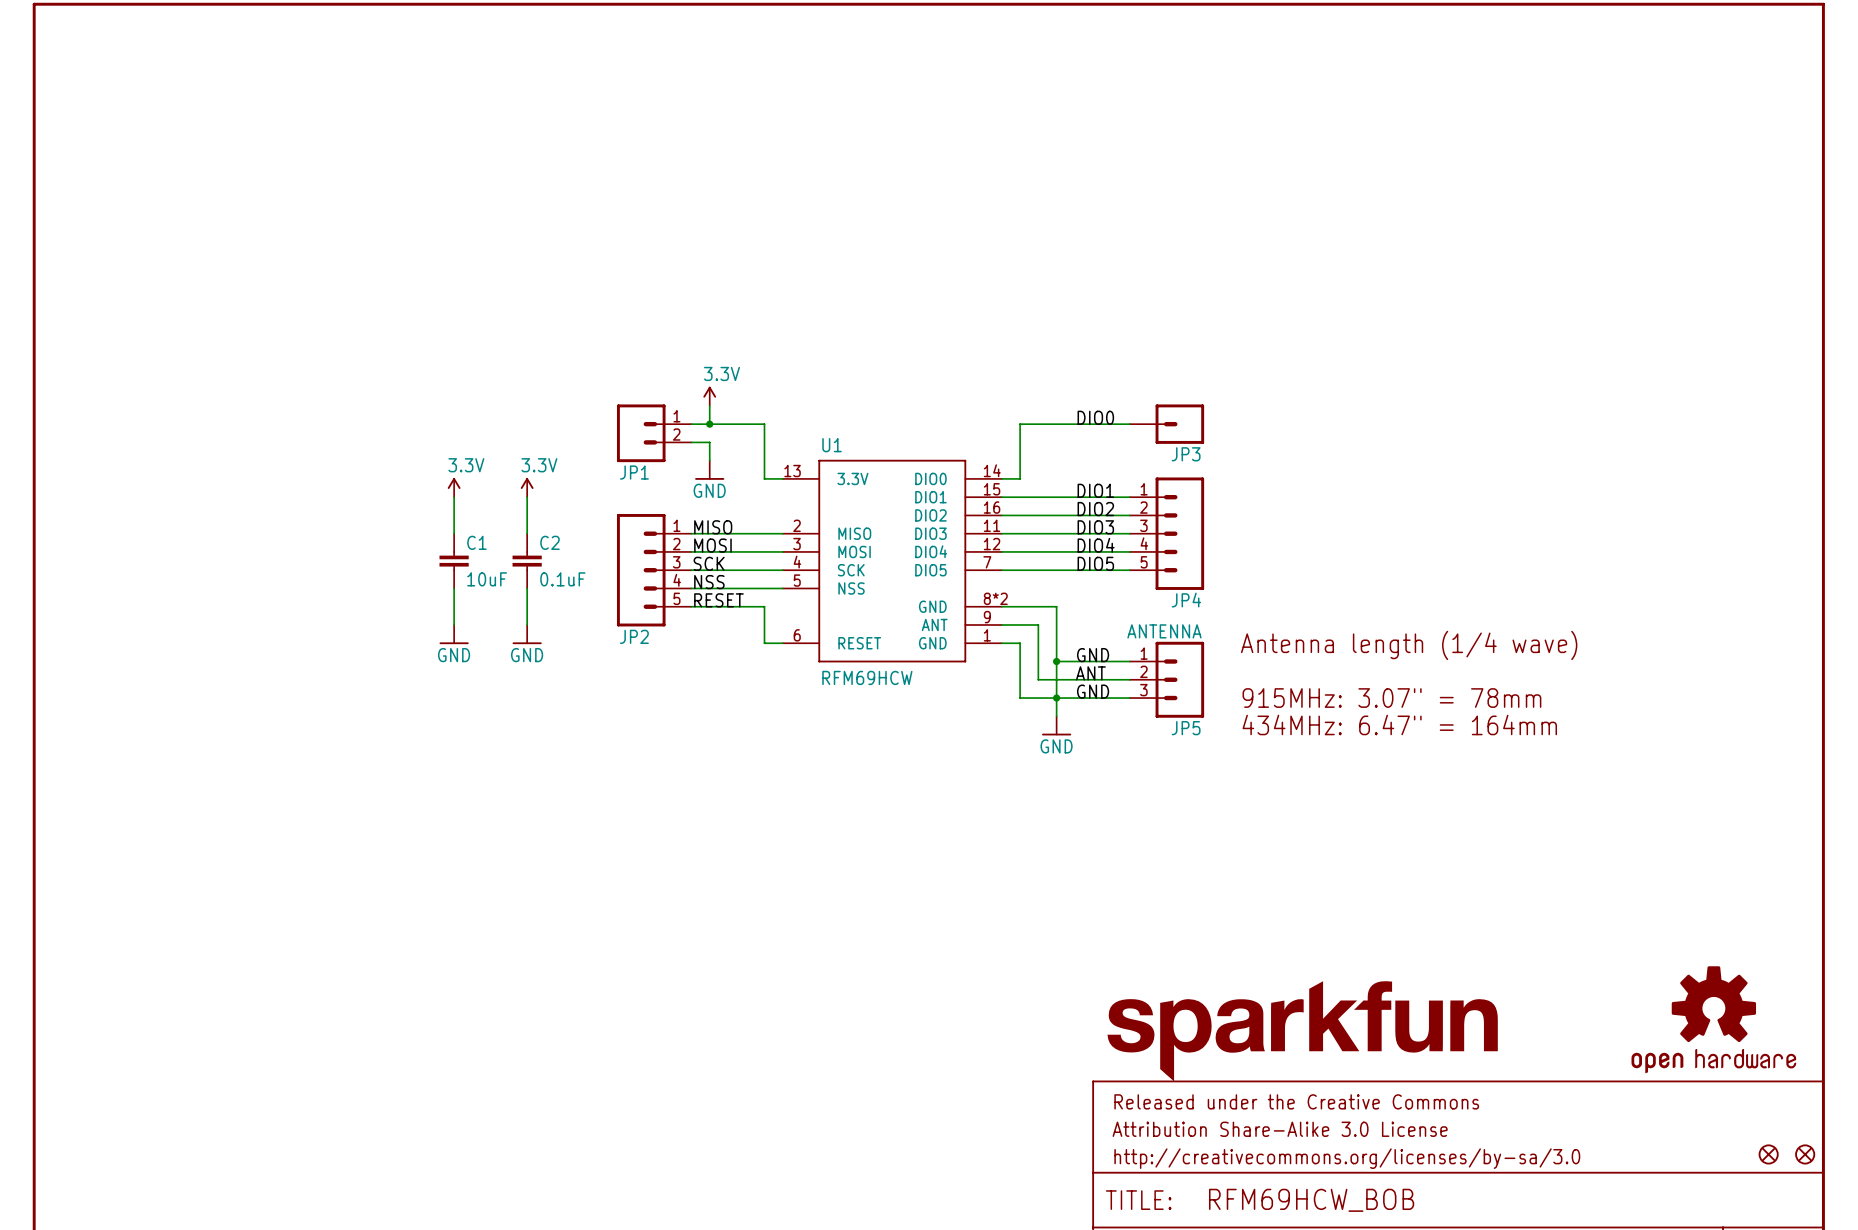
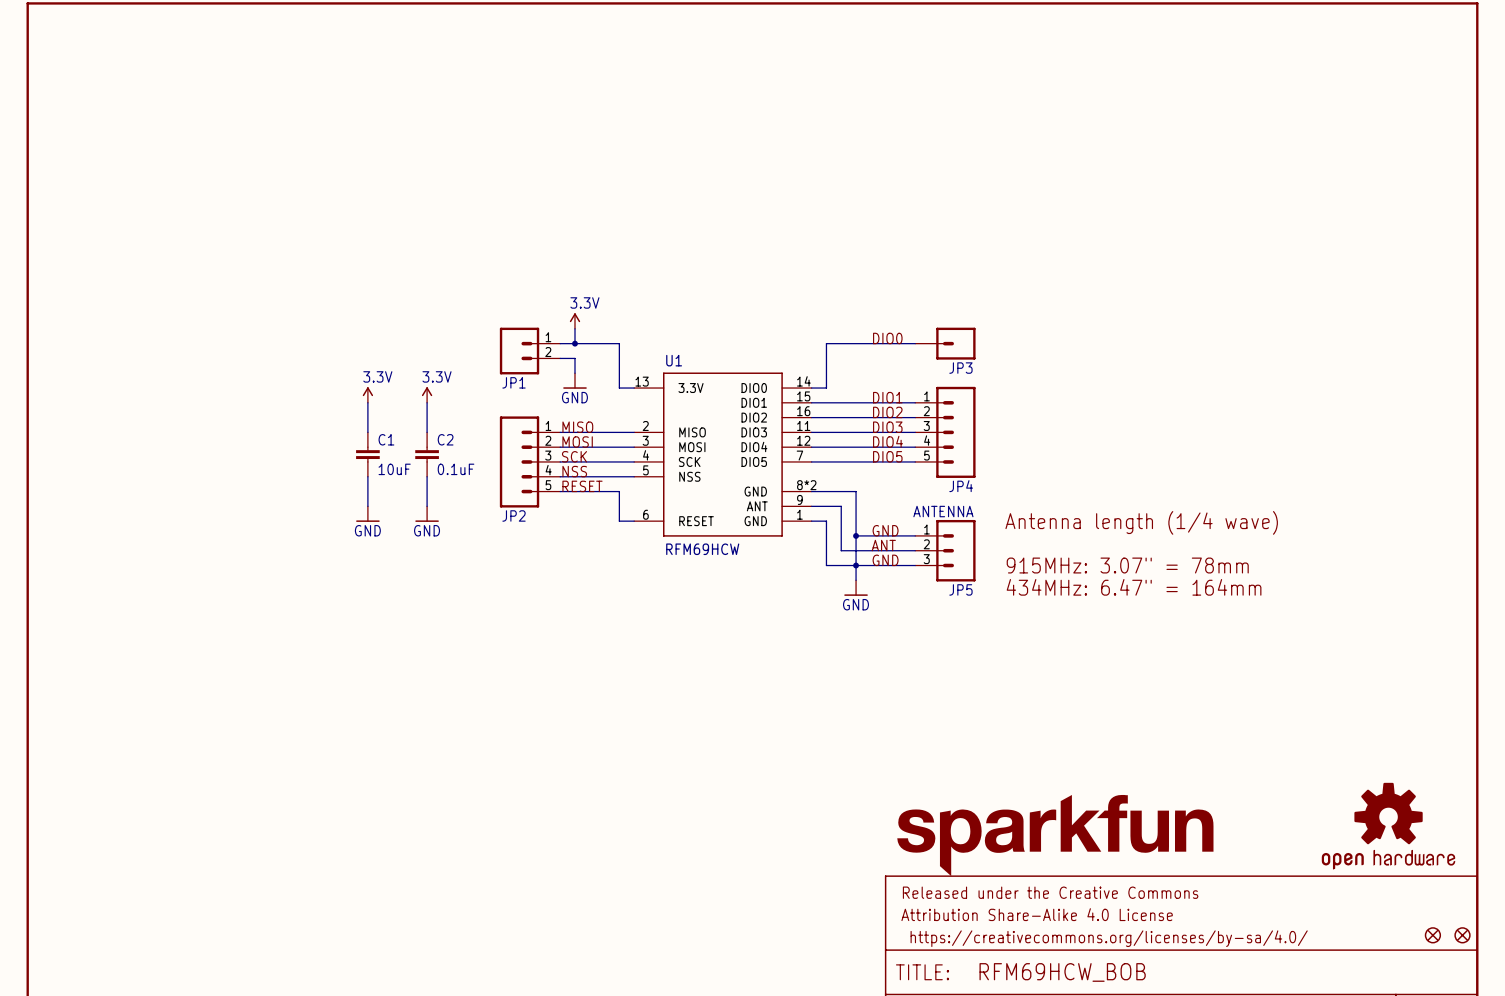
part text: Attribution Share-Alike 3.0 License (1280, 1129) -> Attribution Share-Alike 4.0 License (1037, 914)
part text: http://creativecommons.org/licenses/by-sa/3.0 (1347, 1158) -> https://creativecommons.org/licenses/by-sa/4.0/ (1109, 938)

